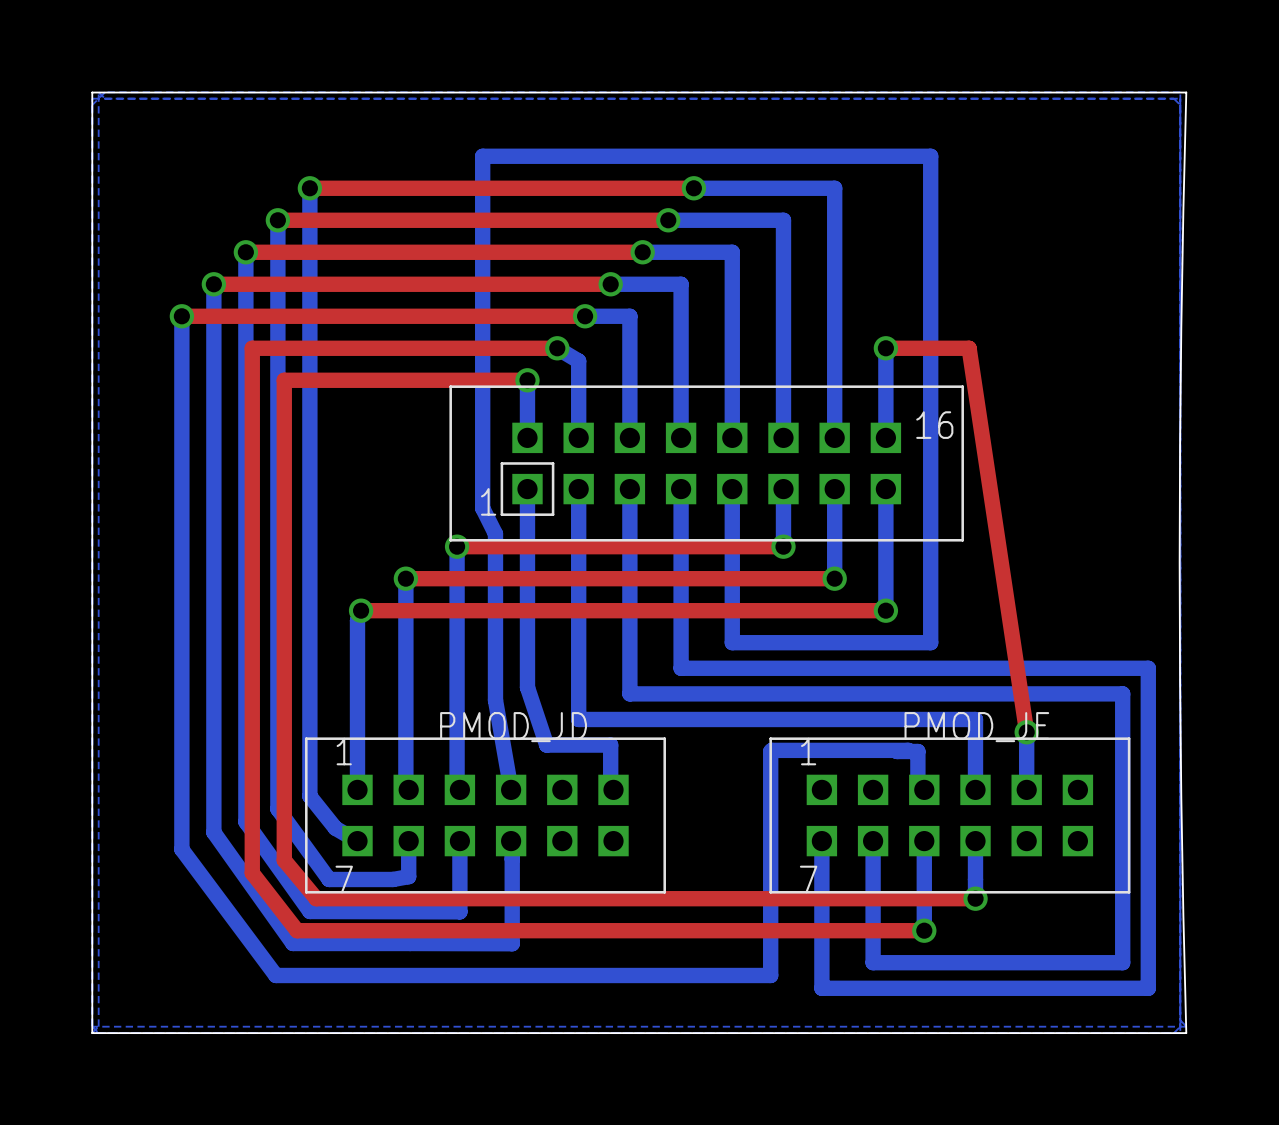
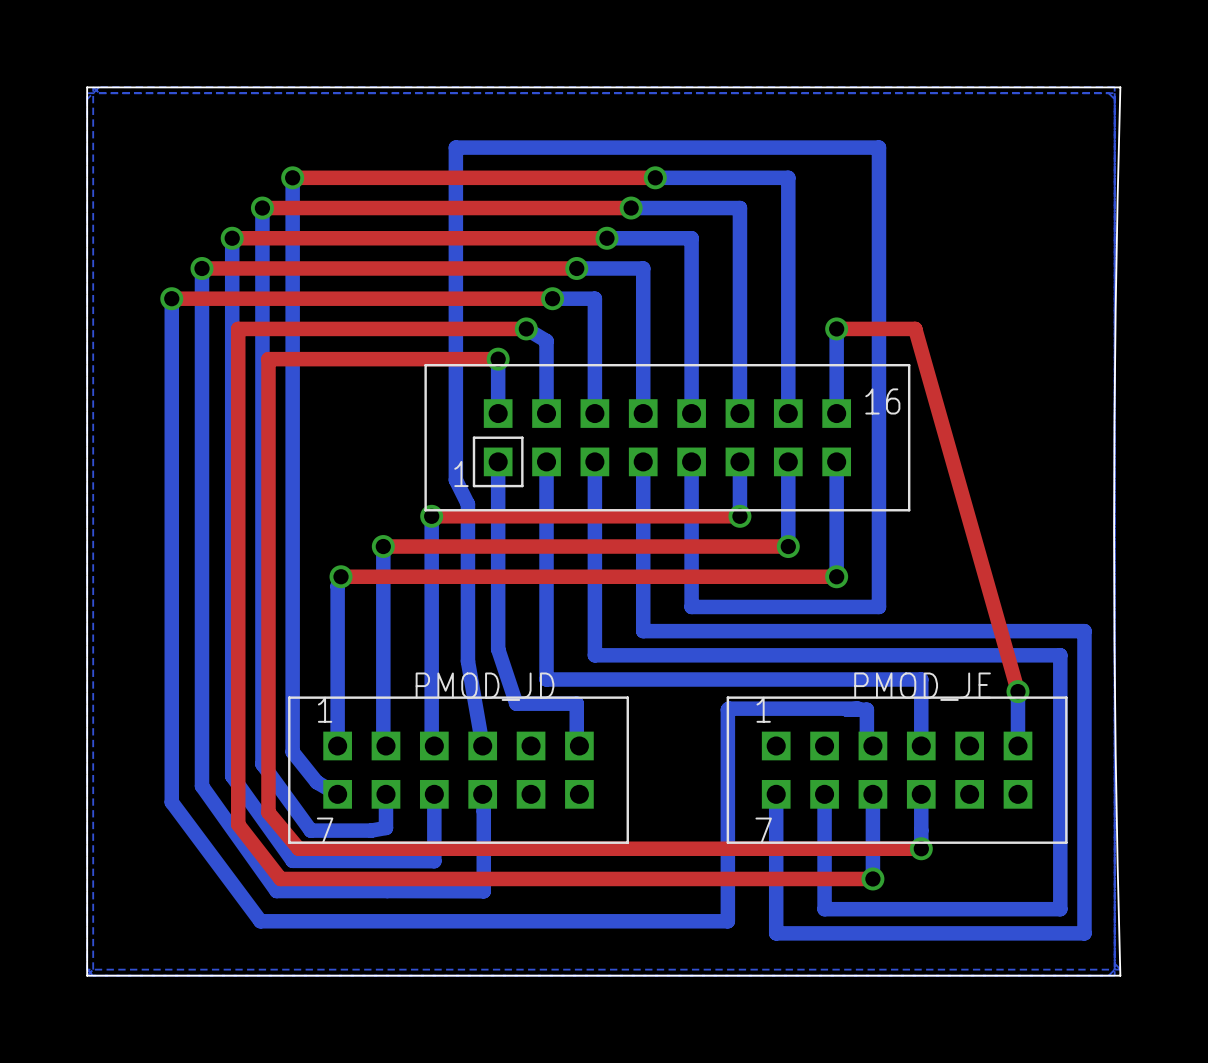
top track: (969, 348) (1026, 732) -> (915, 328) (1017, 691)
bottom track: (1026, 732) (1026, 789) -> (1017, 691) (1017, 745)
via position: (1026, 732) -> (1017, 691)

